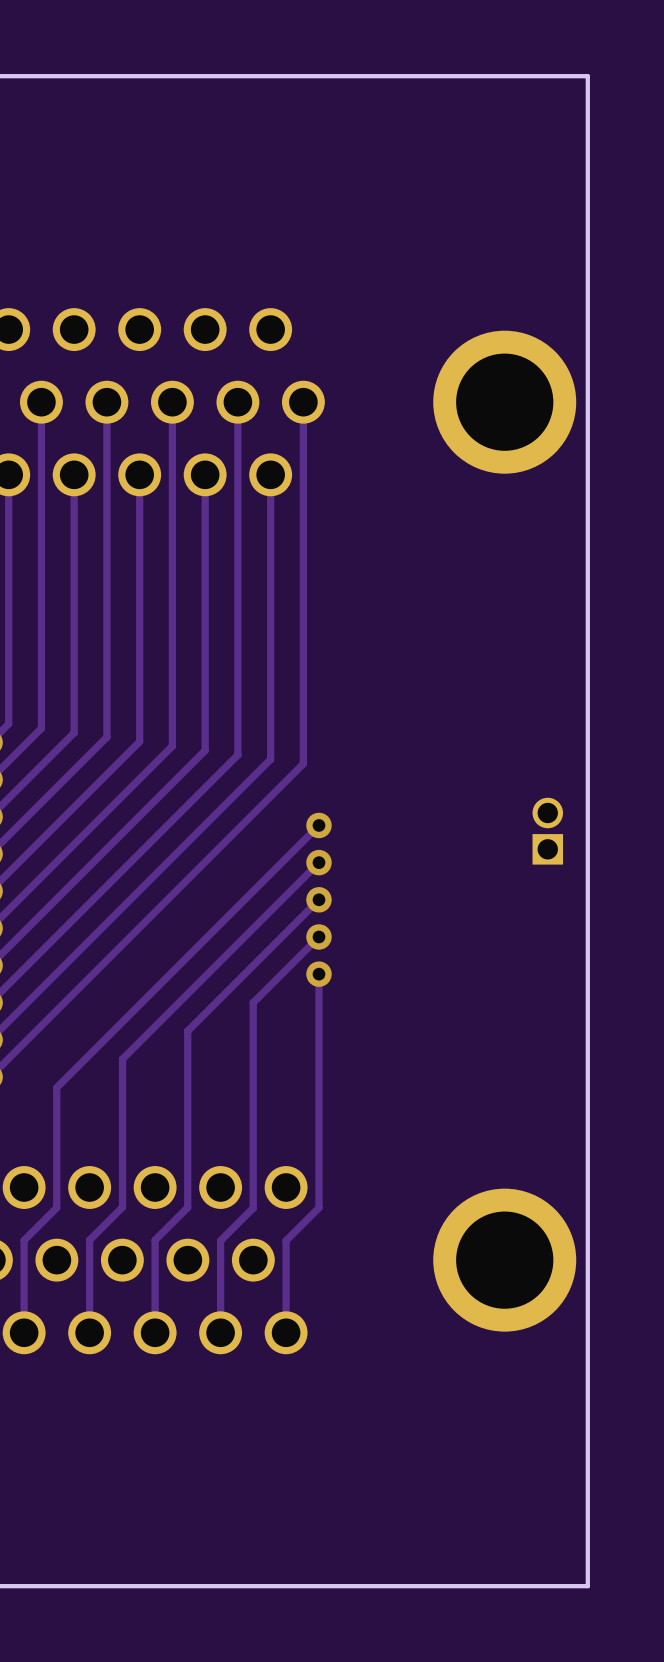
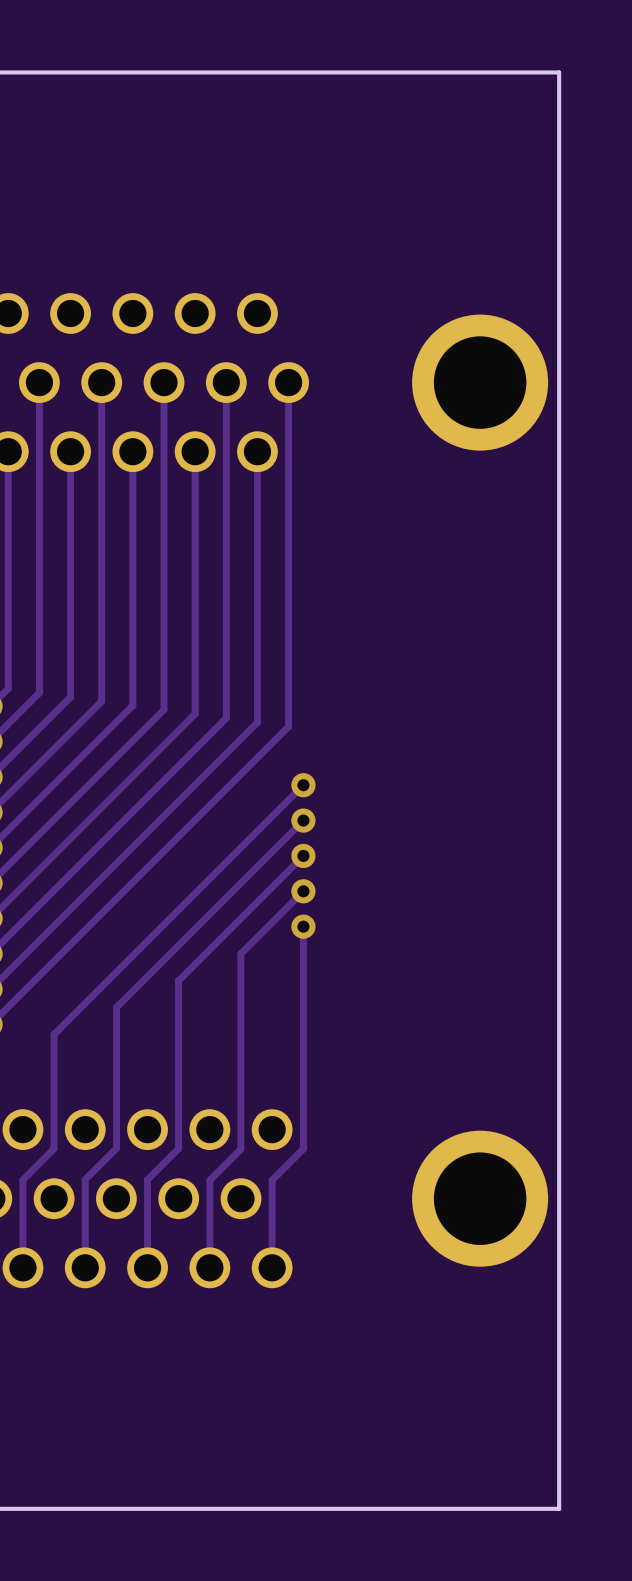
part: (547, 831) -> none

